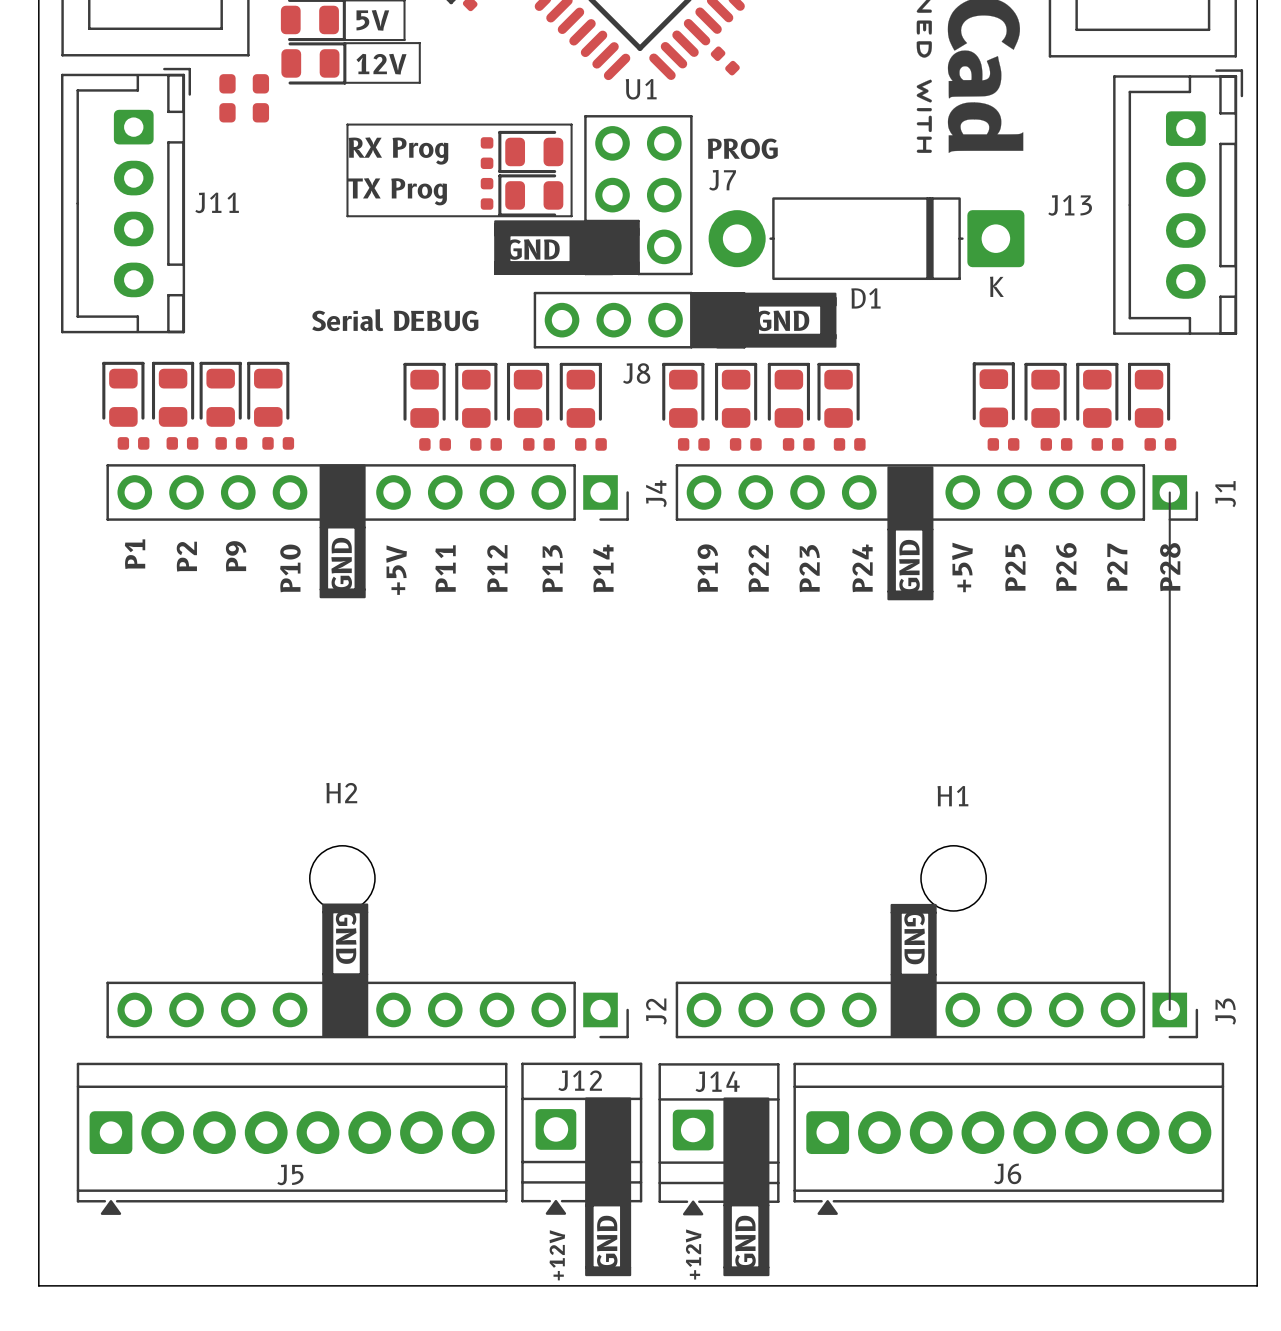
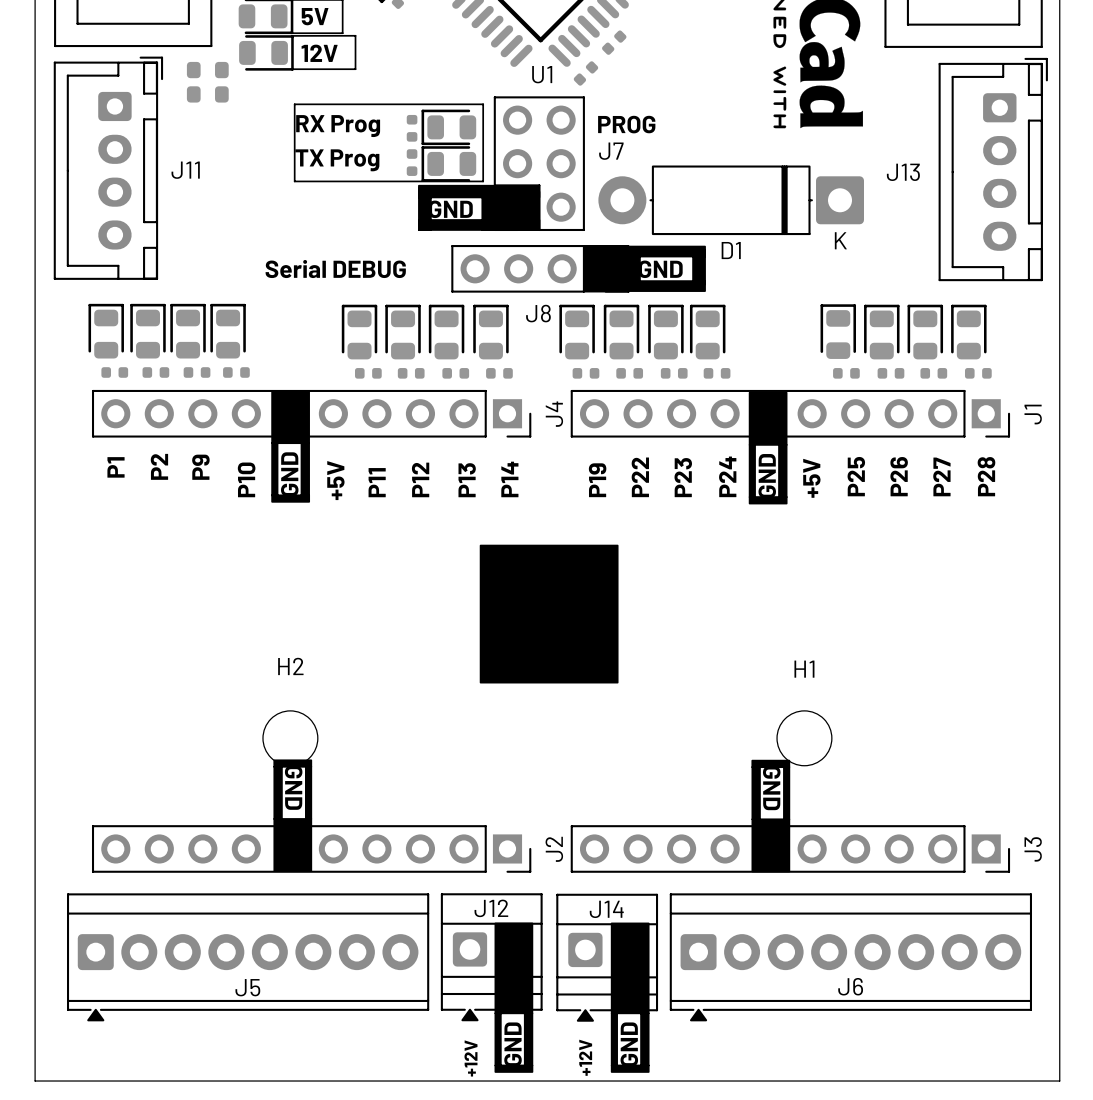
part rotation: 0° (725, 60) -> 90° clockwise (614, 42)
part: none -> (585, 73)
line: (1169, 492) (1169, 1009) -> none
drawing: none -> [479, 544, 619, 684]

